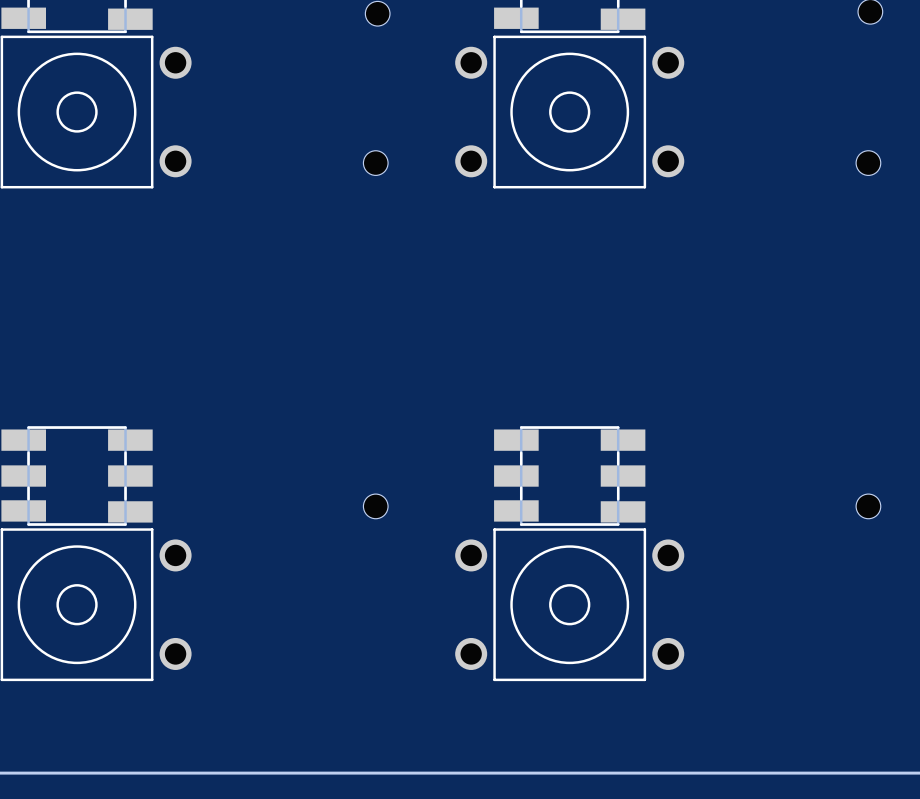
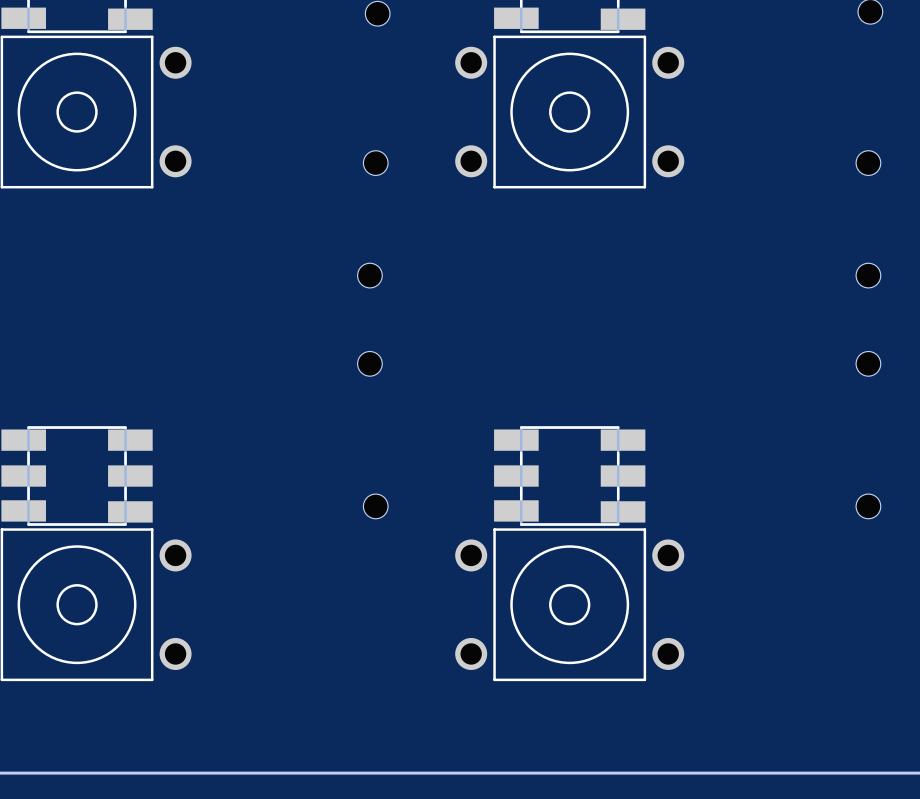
hole: none -> (369, 275)
hole: none -> (868, 275)
hole: none -> (369, 363)
hole: none -> (868, 363)

